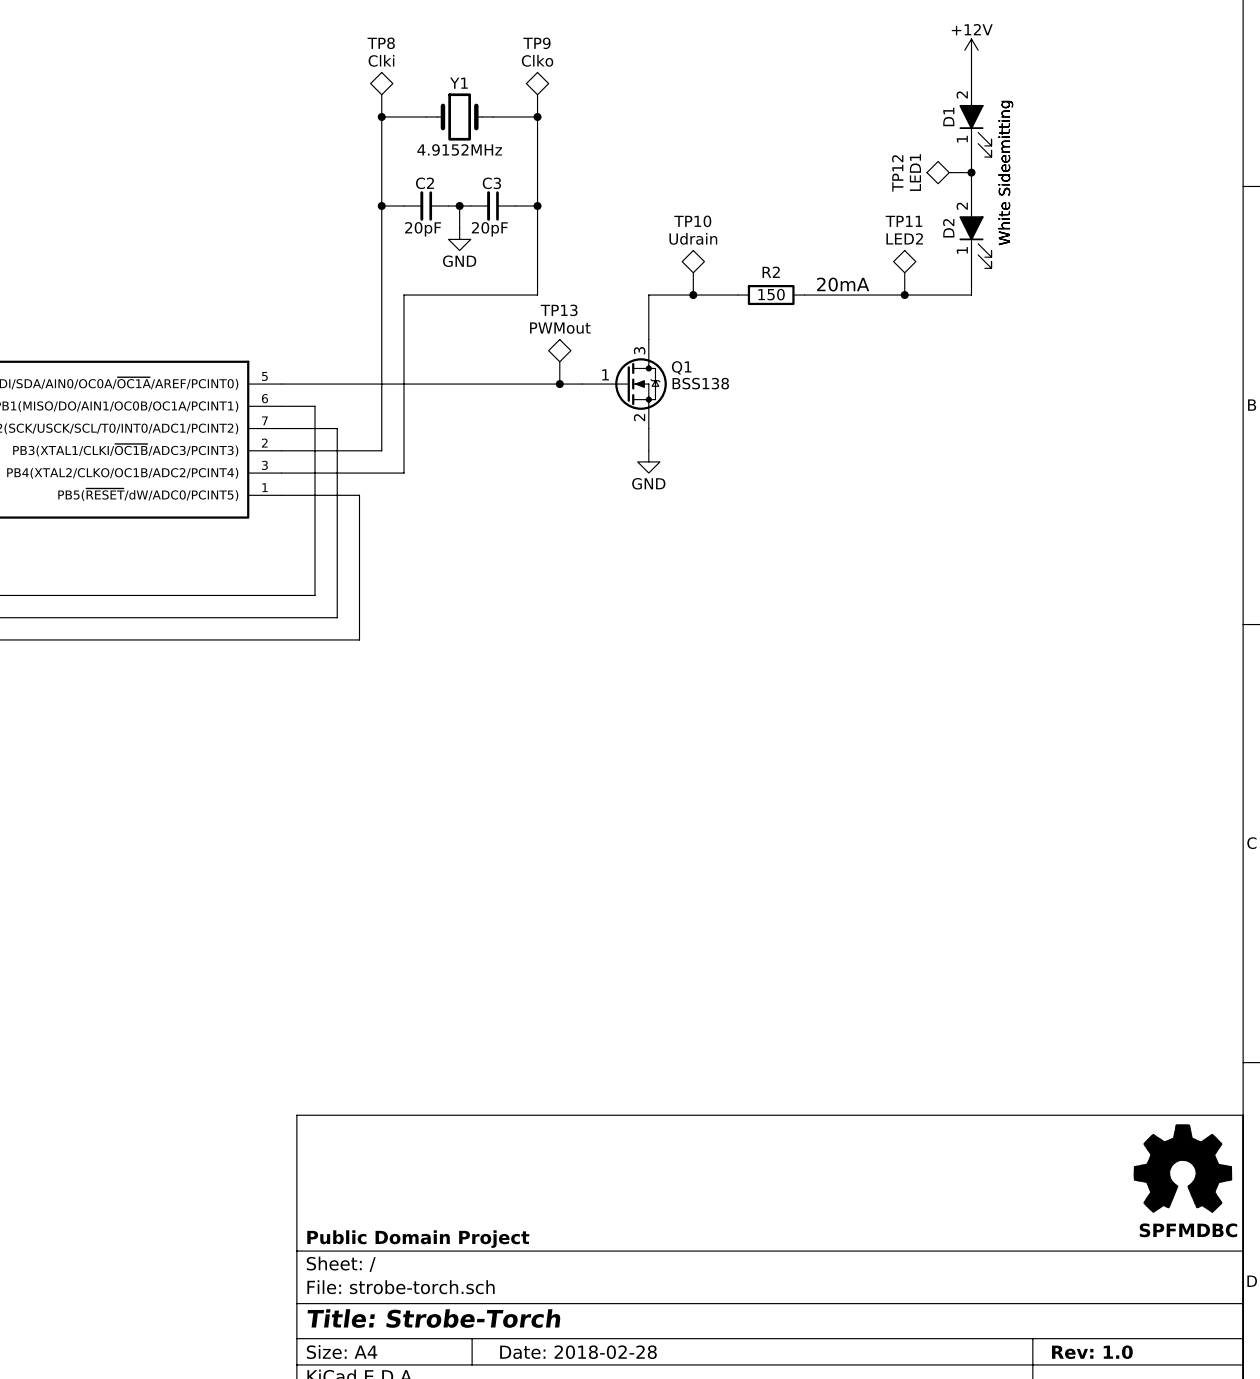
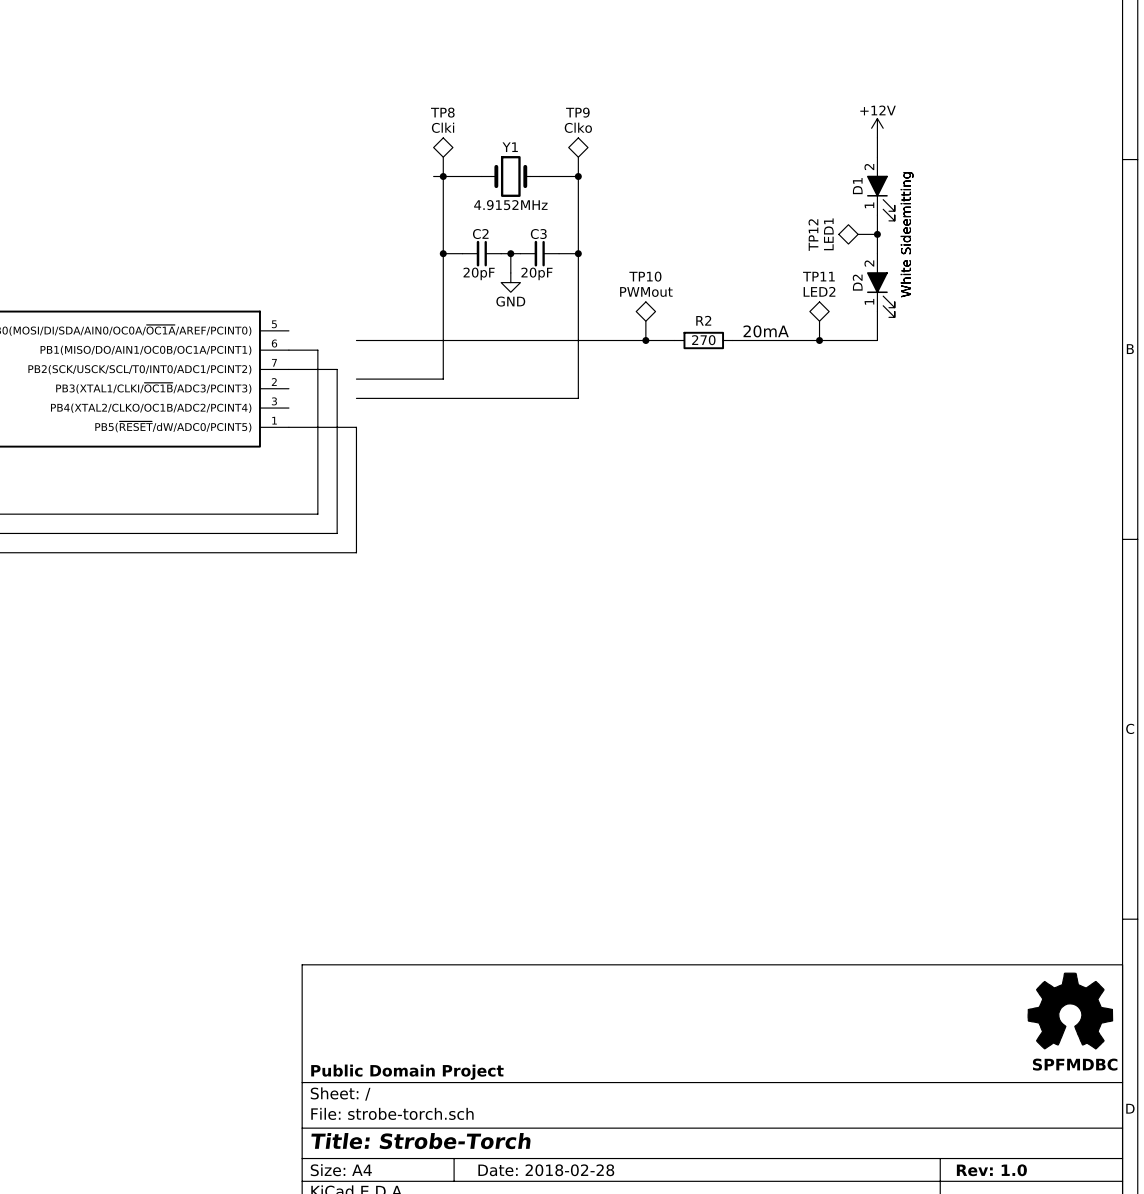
power symbol position: +12V (971, 50) -> +12V (877, 128)
wire: (971, 61) (971, 83) -> (877, 137) (877, 157)
TP8 position: (381, 94) -> (443, 157)
TP9 position: (537, 94) -> (578, 157)
junction: (381, 116) -> none
wire: (426, 116) (381, 116) (381, 450) (281, 450) -> none
Y1 position: (459, 116) -> (510, 176)
wire: (493, 116) (537, 116) (537, 295) -> none
junction: (537, 116) -> none
D1 position: (975, 120) -> (880, 189)
wire: (971, 150) (971, 194) -> (877, 215) (877, 253)
TP12 position: (949, 172) -> (858, 234)
junction: (971, 172) -> none
wire: (381, 206) (404, 206) -> none
junction: (381, 206) -> none
C2 position: (426, 206) -> (481, 253)
C3 position: (493, 206) -> (539, 253)
wire: (515, 206) (537, 206) -> (559, 253) (578, 253)
junction: (537, 206) -> none
wire: none -> (539, 176) (578, 176) (578, 398) (356, 398)
junction: none -> (578, 176)
wire: none -> (443, 195) (443, 379) (356, 379)
D2 position: (975, 231) -> (880, 285)
TP10 value: Udrain (693, 238) -> PWMout (646, 292)
power symbol: GND (459, 239) -> none
wire: (971, 261) (971, 295) (804, 295) -> (877, 311) (877, 340) (732, 340)
TP10 position: (693, 272) -> (645, 321)
TP11 position: (904, 272) -> (819, 321)
junction: none -> (877, 234)
text position: 20mA (843, 284) -> 20mA (766, 331)
R2 value: 150 (771, 294) -> 270 (703, 340)
wire: (459, 295) (404, 295) (404, 473) (281, 473) -> none
junction: none -> (443, 253)
junction: none -> (510, 253)
wire: none -> (520, 253) (510, 253) (510, 272)
junction: none -> (578, 253)
junction: (693, 295) -> none
wire: (737, 295) (648, 295) (648, 339) -> none
R2 position: (771, 295) -> (703, 340)
junction: (904, 295) -> none
power symbol: none -> GND (510, 282)
TP13: PWMout (559, 361) -> none
wire: (281, 384) (582, 384) -> none
junction: (559, 384) -> none
Q1: BSS138 (624, 384) -> none
wire: none -> (356, 340) (674, 340)
junction: none -> (645, 340)
junction: none -> (819, 340)
wire: (648, 428) (648, 450) -> none
power symbol: GND (648, 461) -> none

